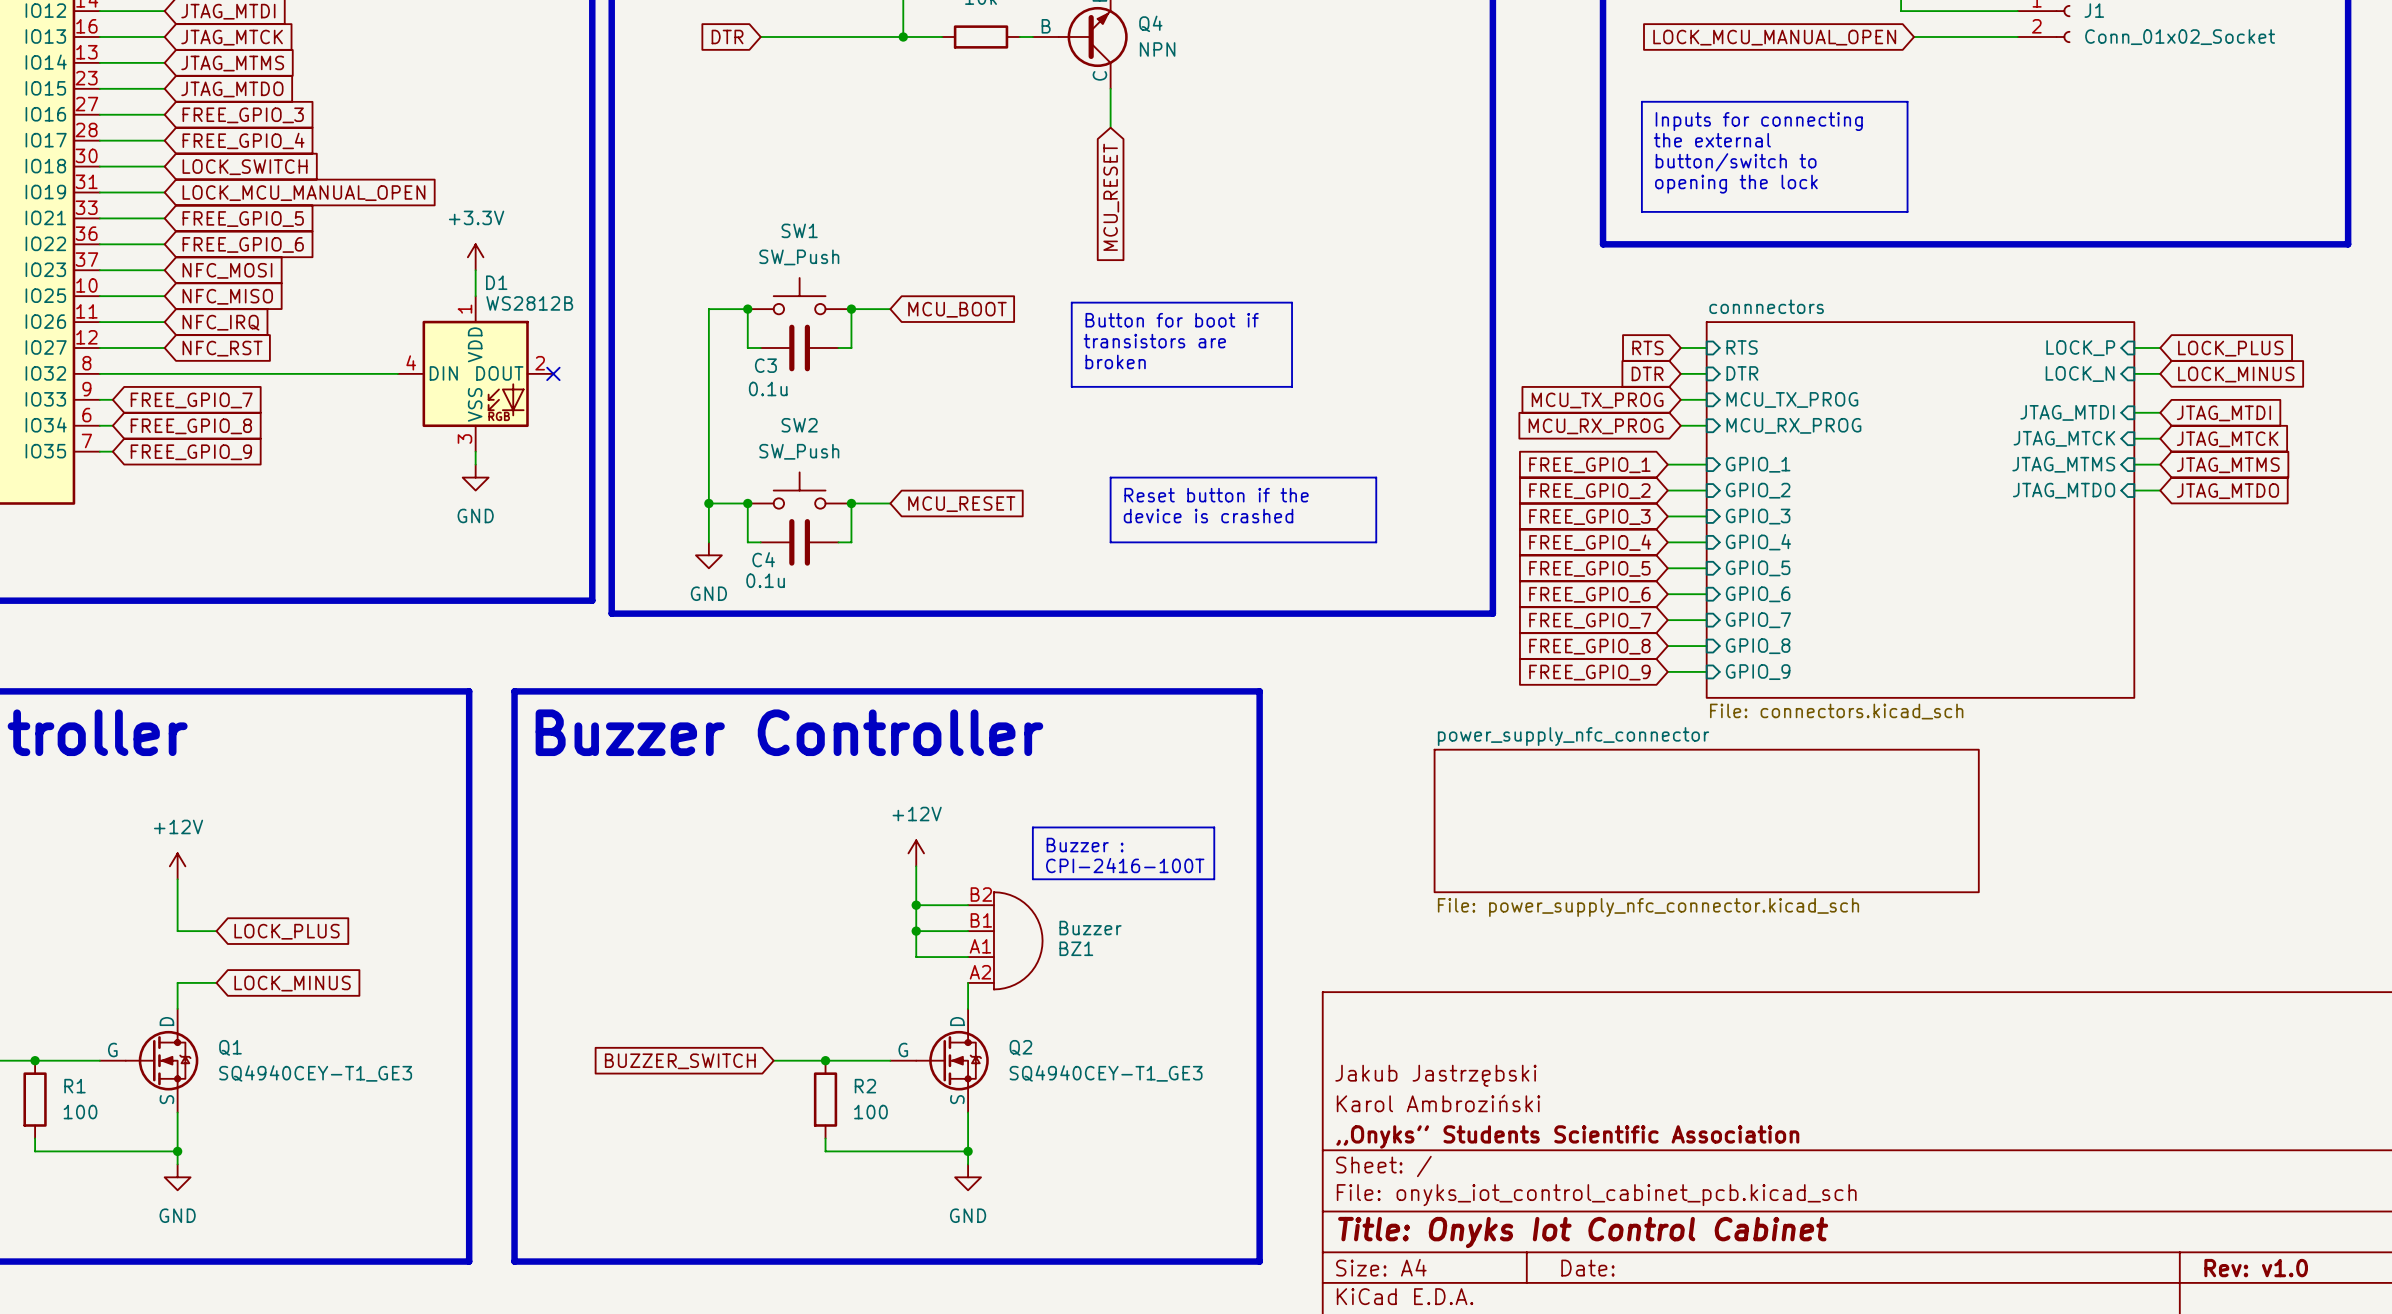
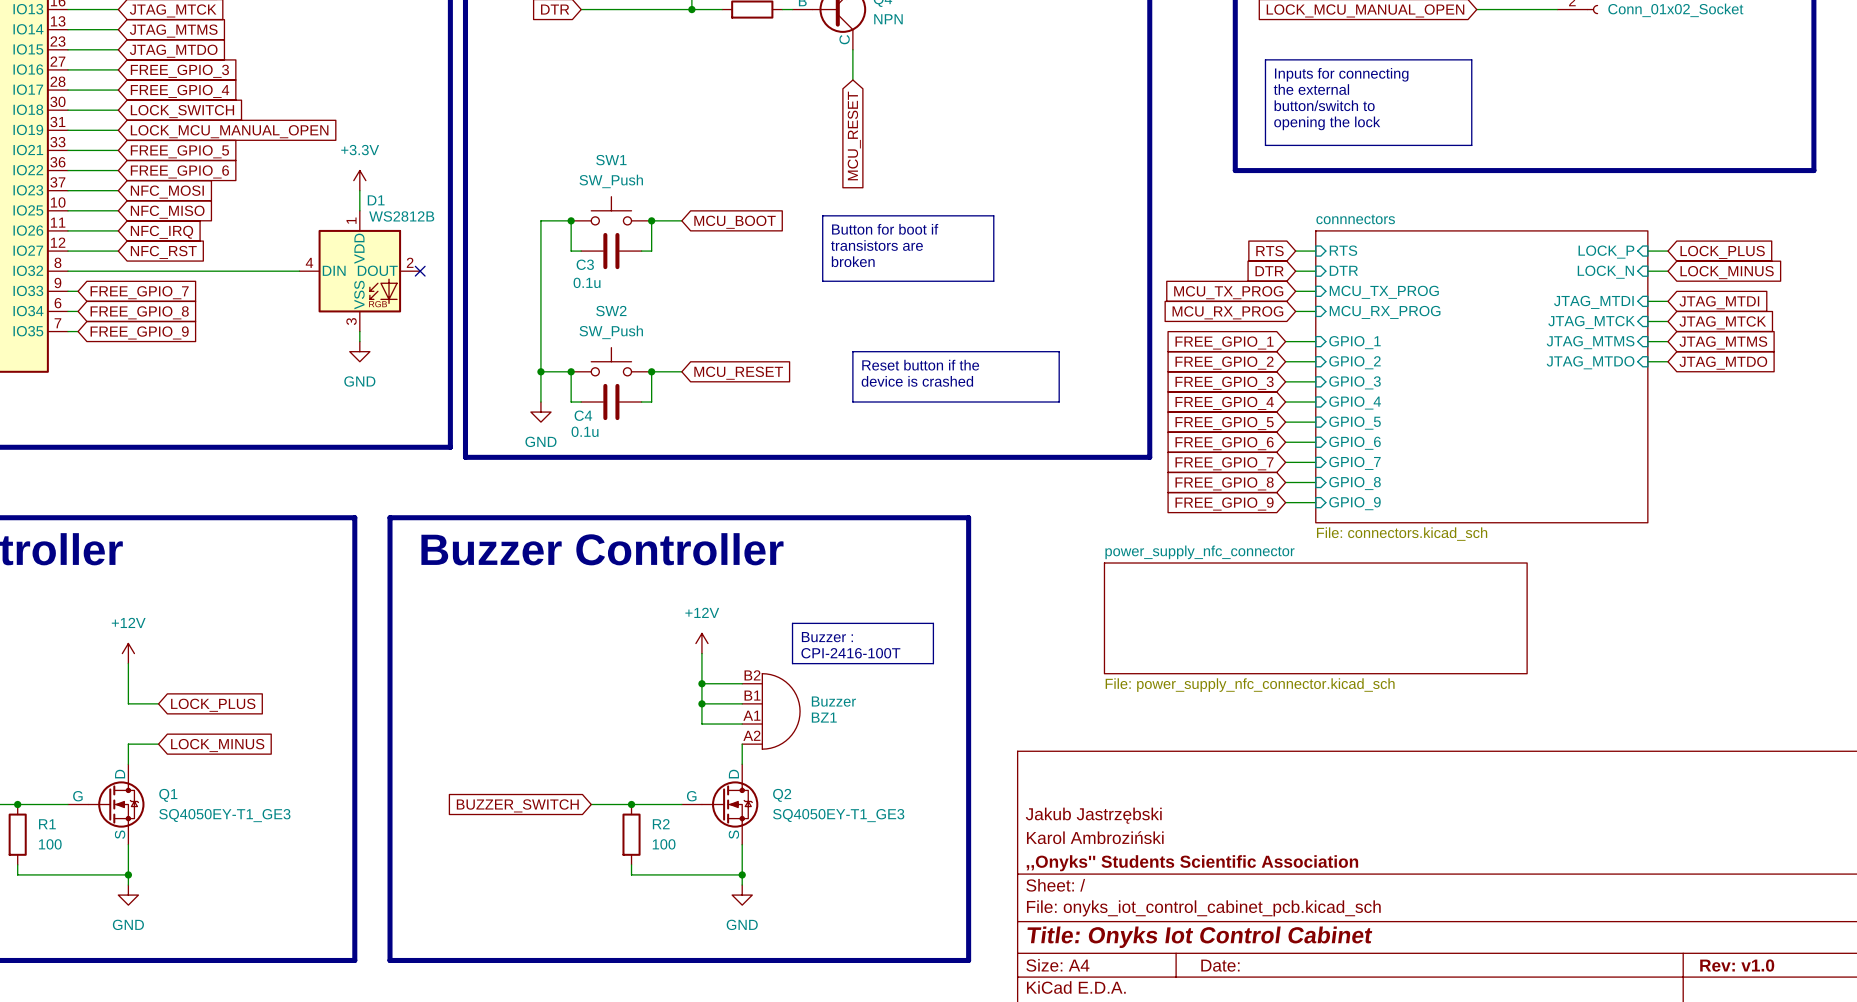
Q1 value: SQ4940CEY-T1_GE3 (315, 1073) -> SQ4050EY-T1_GE3 (224, 815)
Q2 value: SQ4940CEY-T1_GE3 (1106, 1073) -> SQ4050EY-T1_GE3 (838, 815)

